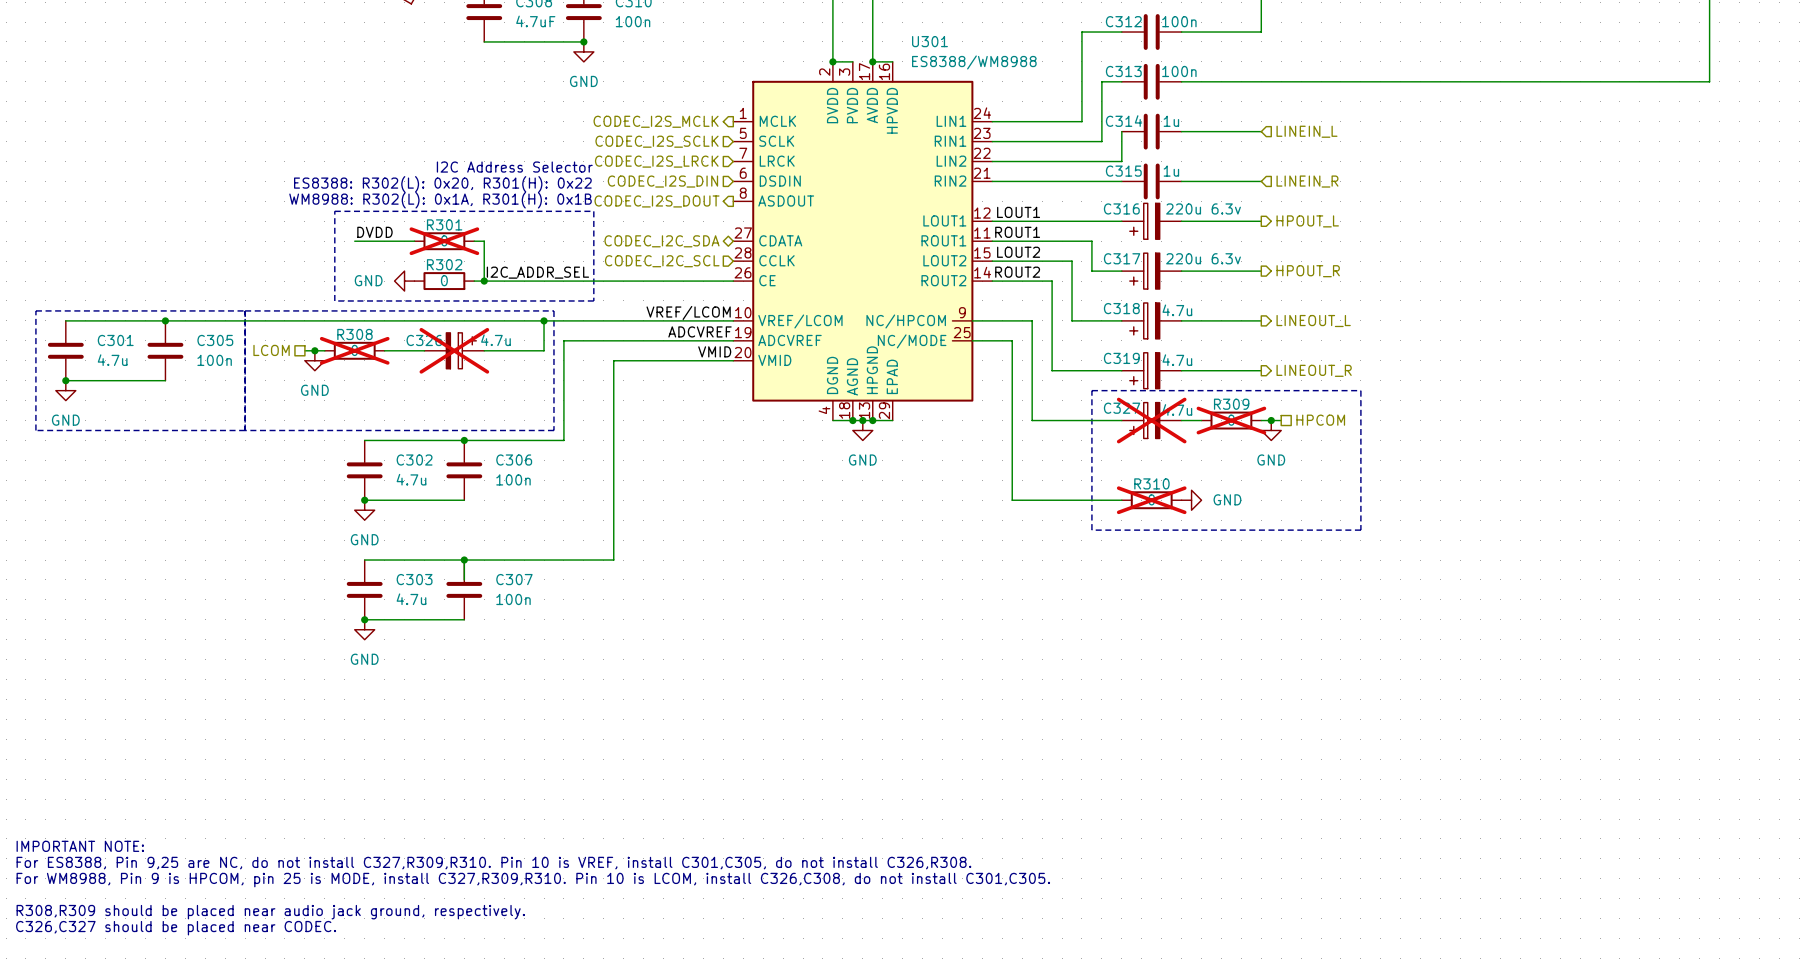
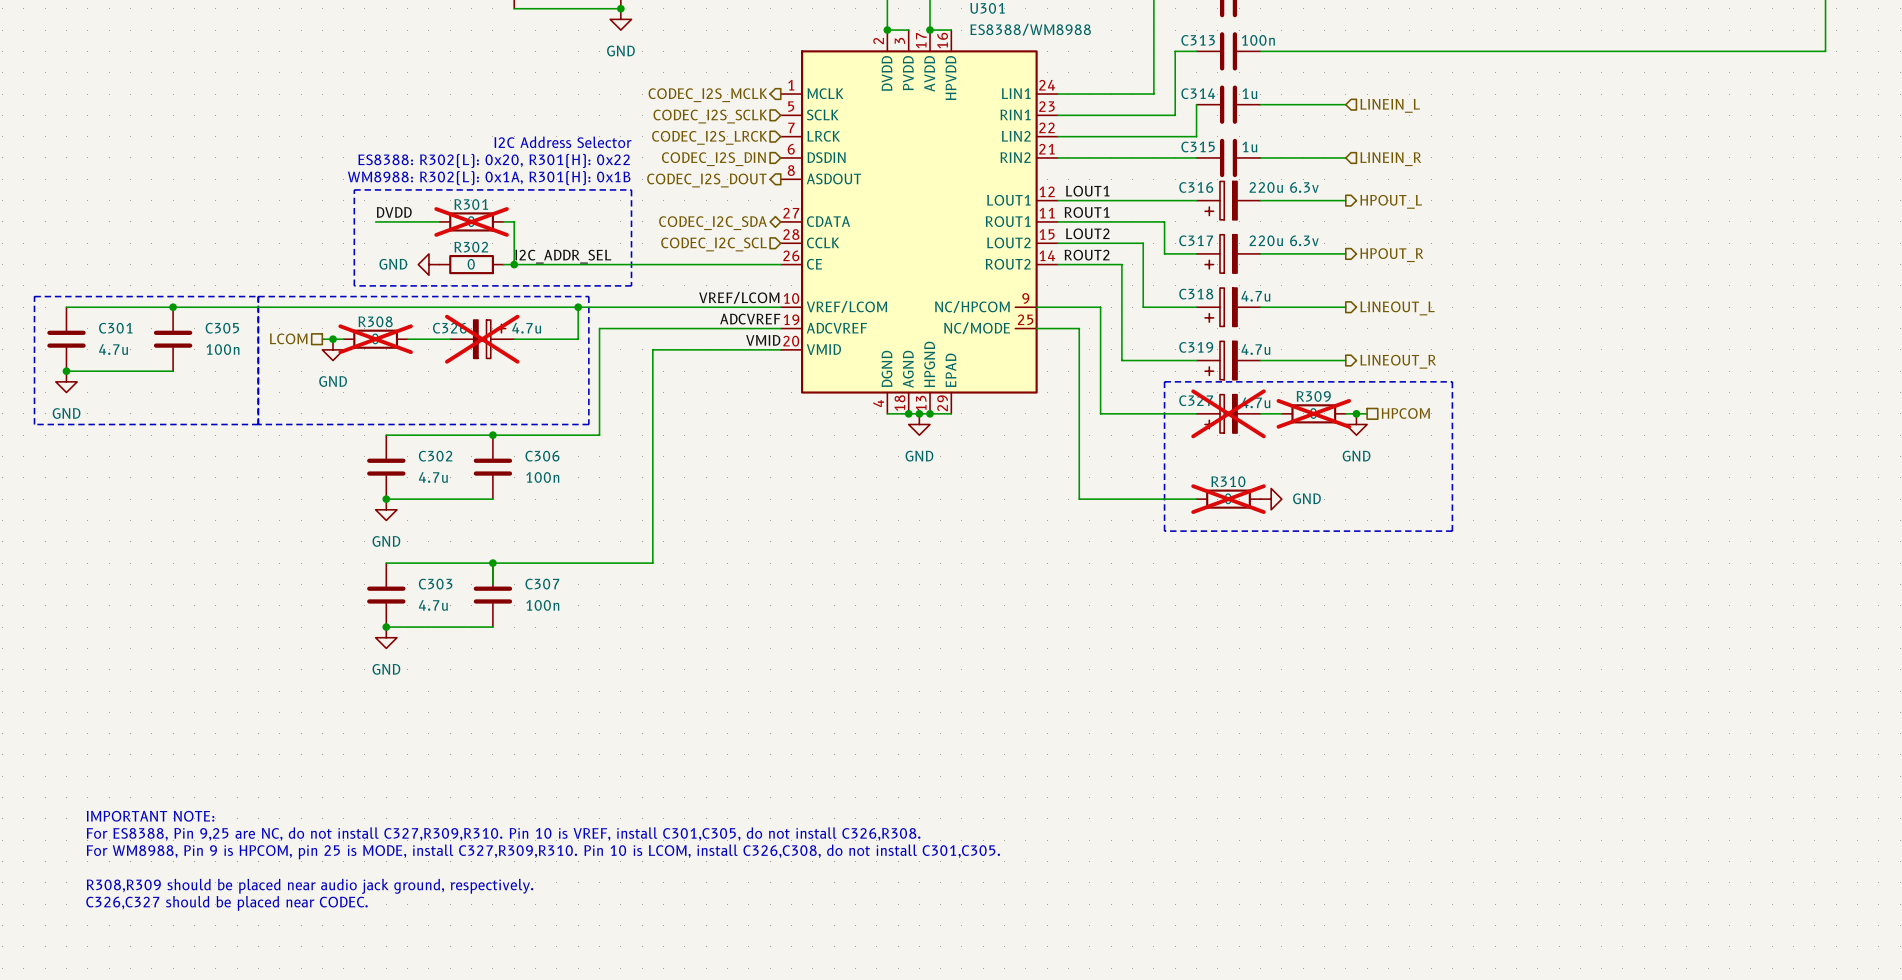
text position: IMPORTANT NOTE: (80, 846) -> IMPORTANT NOTE: (150, 816)
text position: For ES8388, Pin 9,25 are NC, do not install C327,R309,R310. Pin 10 is VREF, install C301,C305, do not install C326,R308. (493, 863) -> For ES8388, Pin 9,25 are NC, do not install C327,R309,R310. Pin 10 is VREF, install C301,C305, do not install C326,R308. (503, 834)
text position: For WM8988, Pin 9 is HPCOM, pin 25 is MODE, install C327,R309,R310. Pin 10 is LCOM, install C326,C308, do not install C301,C305. (533, 880) -> For WM8988, Pin 9 is HPCOM, pin 25 is MODE, install C327,R309,R310. Pin 10 is LCOM, install C326,C308, do not install C301,C305. (543, 851)
text position: R308,R309 should be placed near audio jack ground, respectively. (270, 912) -> R308,R309 should be placed near audio jack ground, respectively. (310, 886)
text position: C326,C327 should be placed near CODEC. (176, 928) -> C326,C327 should be placed near CODEC. (227, 903)

